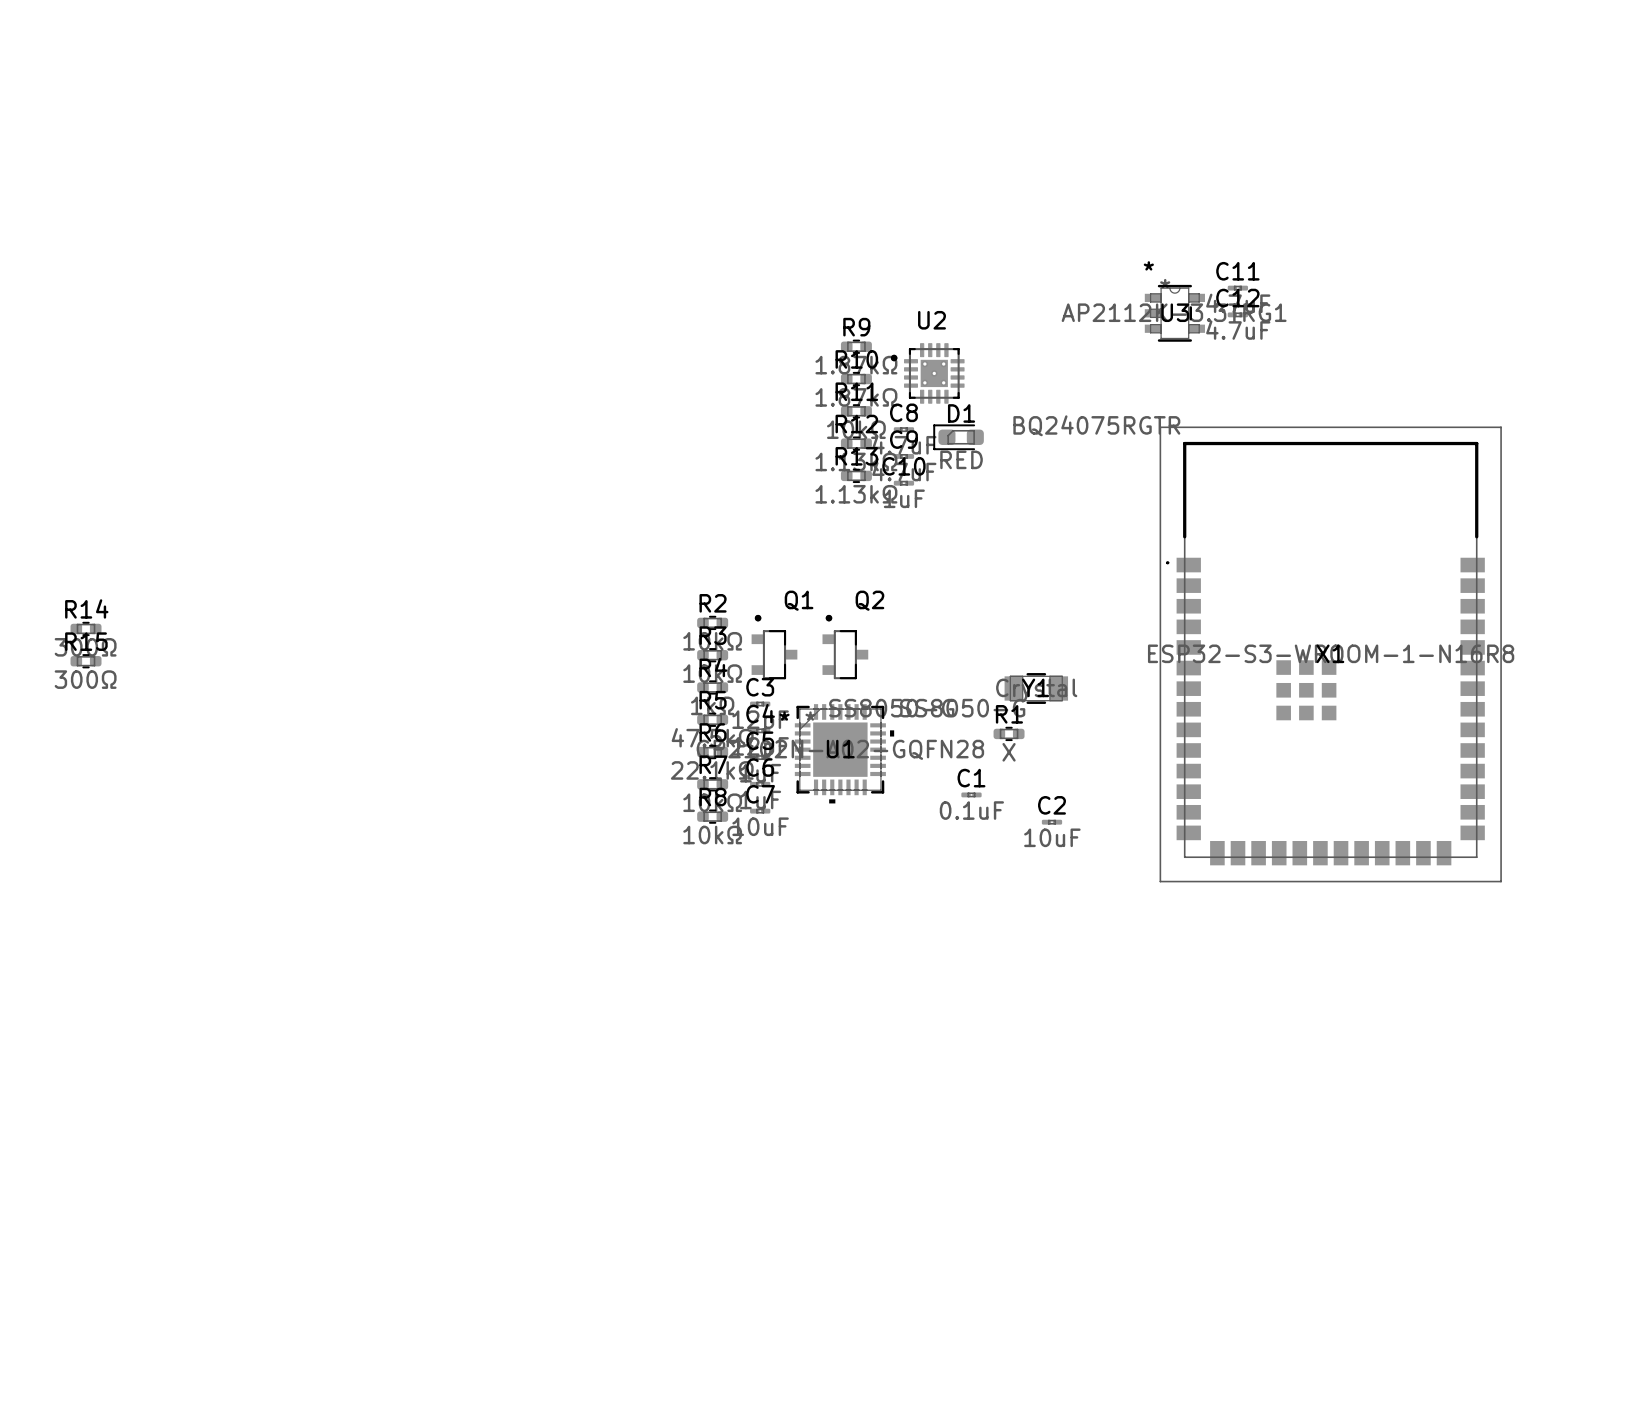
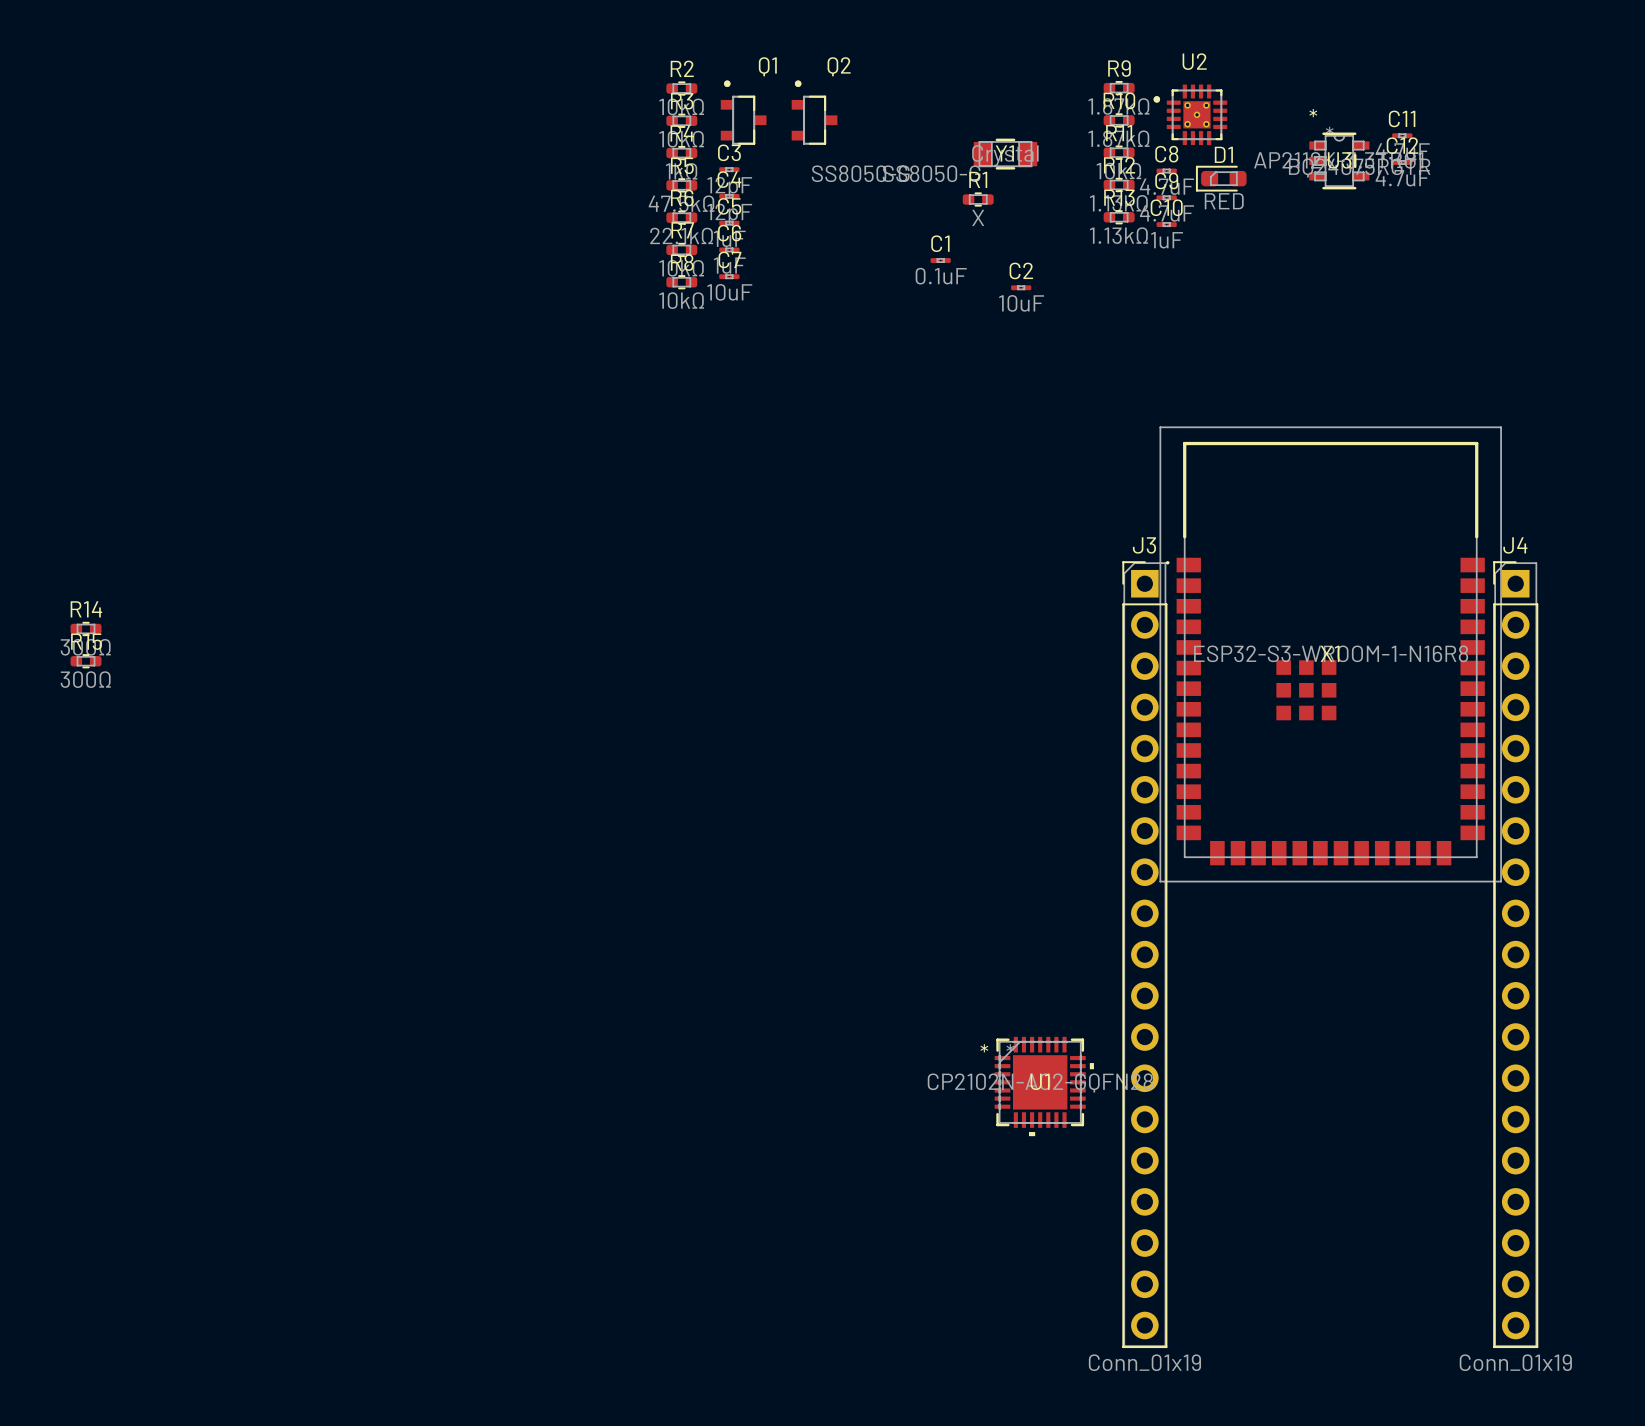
C11 position: (1237, 288) -> (1402, 135)
U3 position: (1174, 313) -> (1339, 160)
C12 position: (1237, 314) -> (1402, 162)
R9 position: (856, 346) -> (1119, 88)
U2 position: (927, 373) -> (1190, 114)
R10 position: (856, 379) -> (1119, 120)
R11 position: (856, 411) -> (1119, 152)
C8 position: (903, 429) -> (1166, 171)
D1 position: (958, 437) -> (1221, 178)
R12 position: (856, 443) -> (1119, 184)
C9 position: (903, 456) -> (1166, 197)
R13 position: (856, 475) -> (1119, 217)
C10 position: (903, 483) -> (1166, 224)
R2 position: (712, 622) -> (681, 88)
Q1 position: (774, 647) -> (743, 112)
Q2 position: (845, 647) -> (814, 112)
R3 position: (712, 655) -> (681, 120)
R4 position: (712, 687) -> (681, 153)
Y1 position: (1036, 688) -> (1005, 154)
C3 position: (760, 704) -> (729, 169)
R5 position: (712, 719) -> (681, 185)
C4 position: (760, 730) -> (729, 196)
R1 position: (1009, 733) -> (978, 199)
R6 position: (712, 752) -> (681, 217)
U1 position: (844, 753) -> (1044, 1086)
C5 position: (760, 757) -> (729, 223)
R7 position: (712, 784) -> (681, 249)
C6 position: (760, 784) -> (729, 249)
C1 position: (971, 794) -> (940, 260)
C7 position: (760, 811) -> (729, 276)
R8 position: (712, 816) -> (681, 282)
C2 position: (1051, 822) -> (1021, 287)
J3: none -> Conn_01x19 (1144, 954)
J4: none -> Conn_01x19 (1515, 954)

